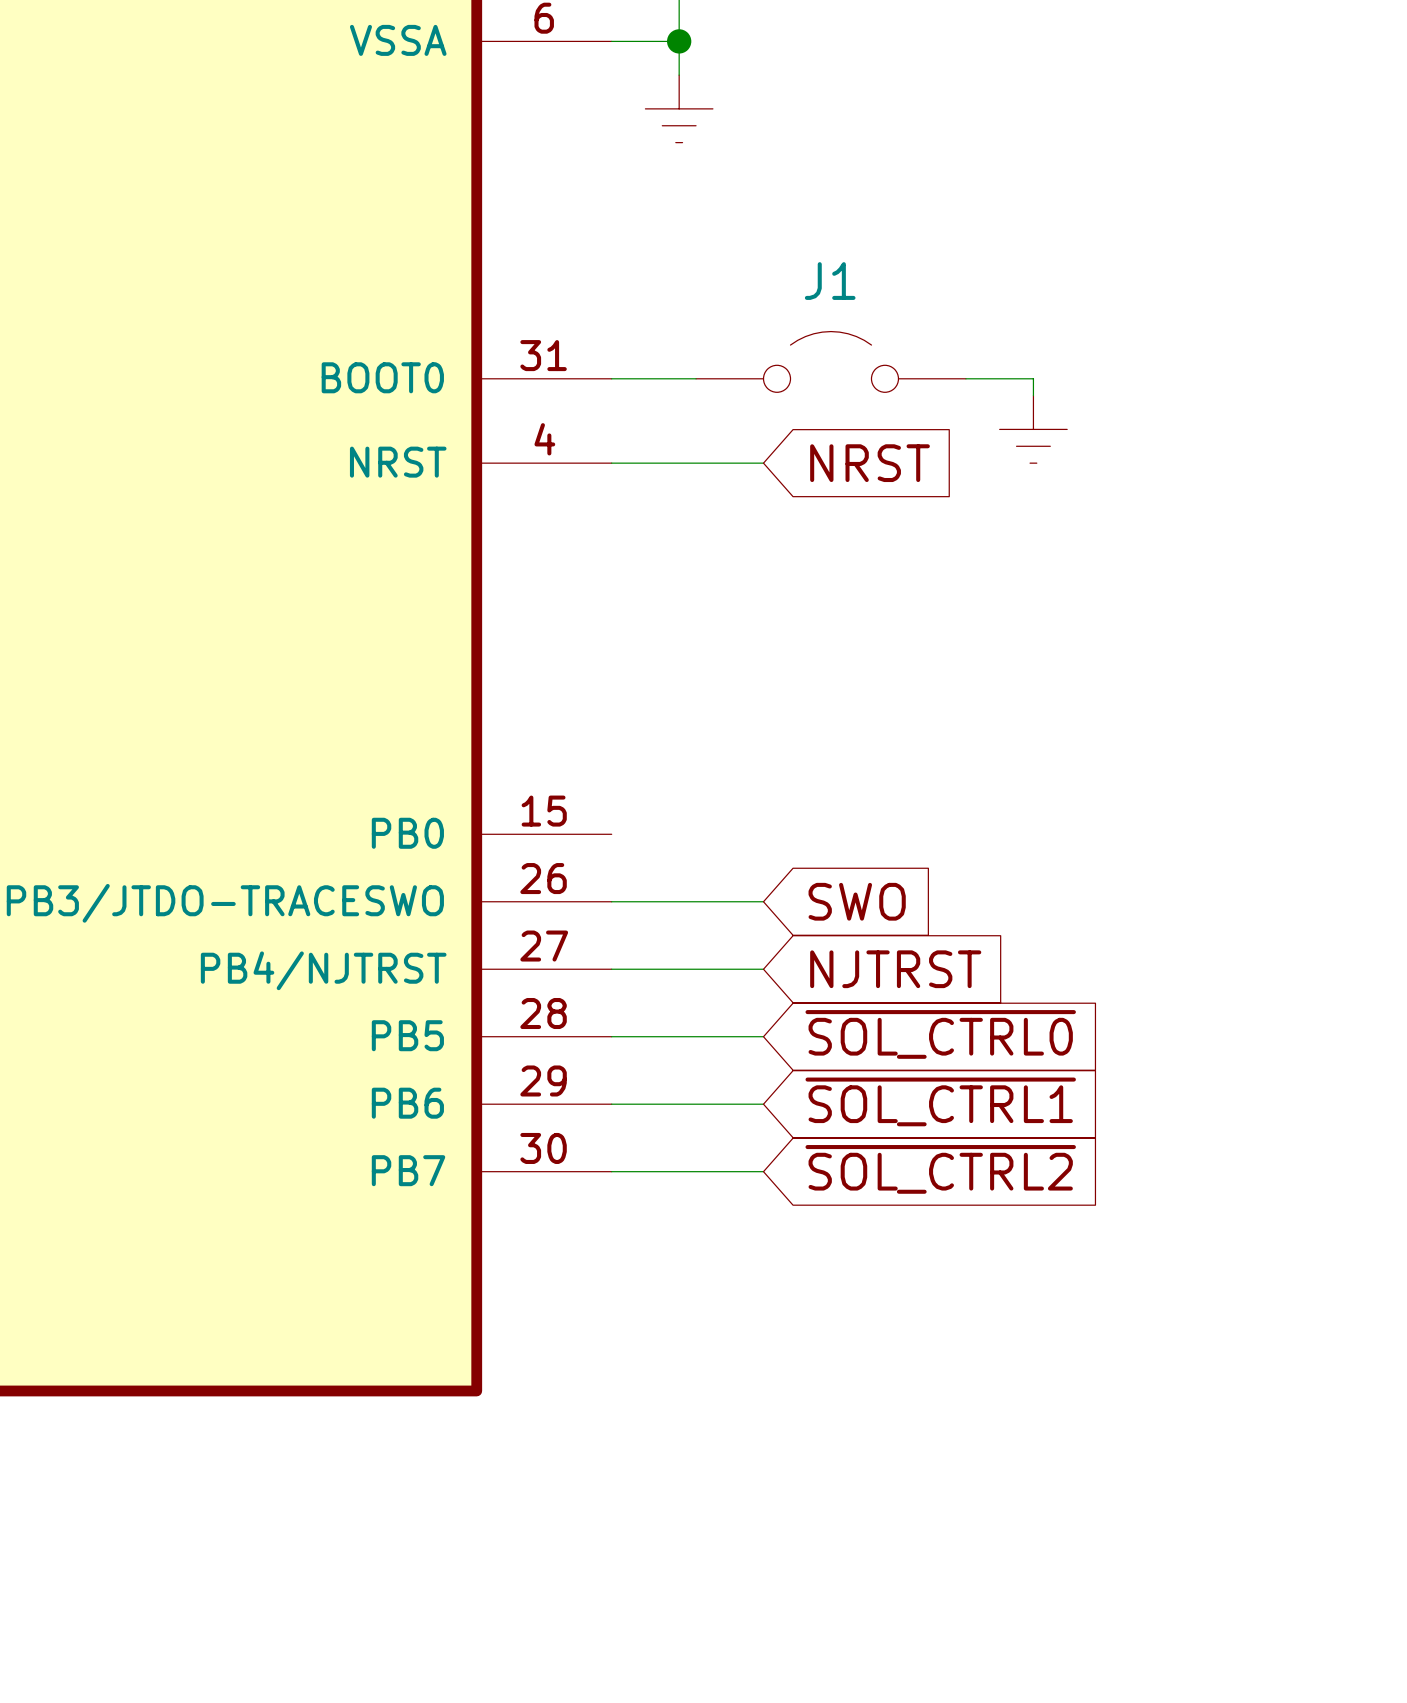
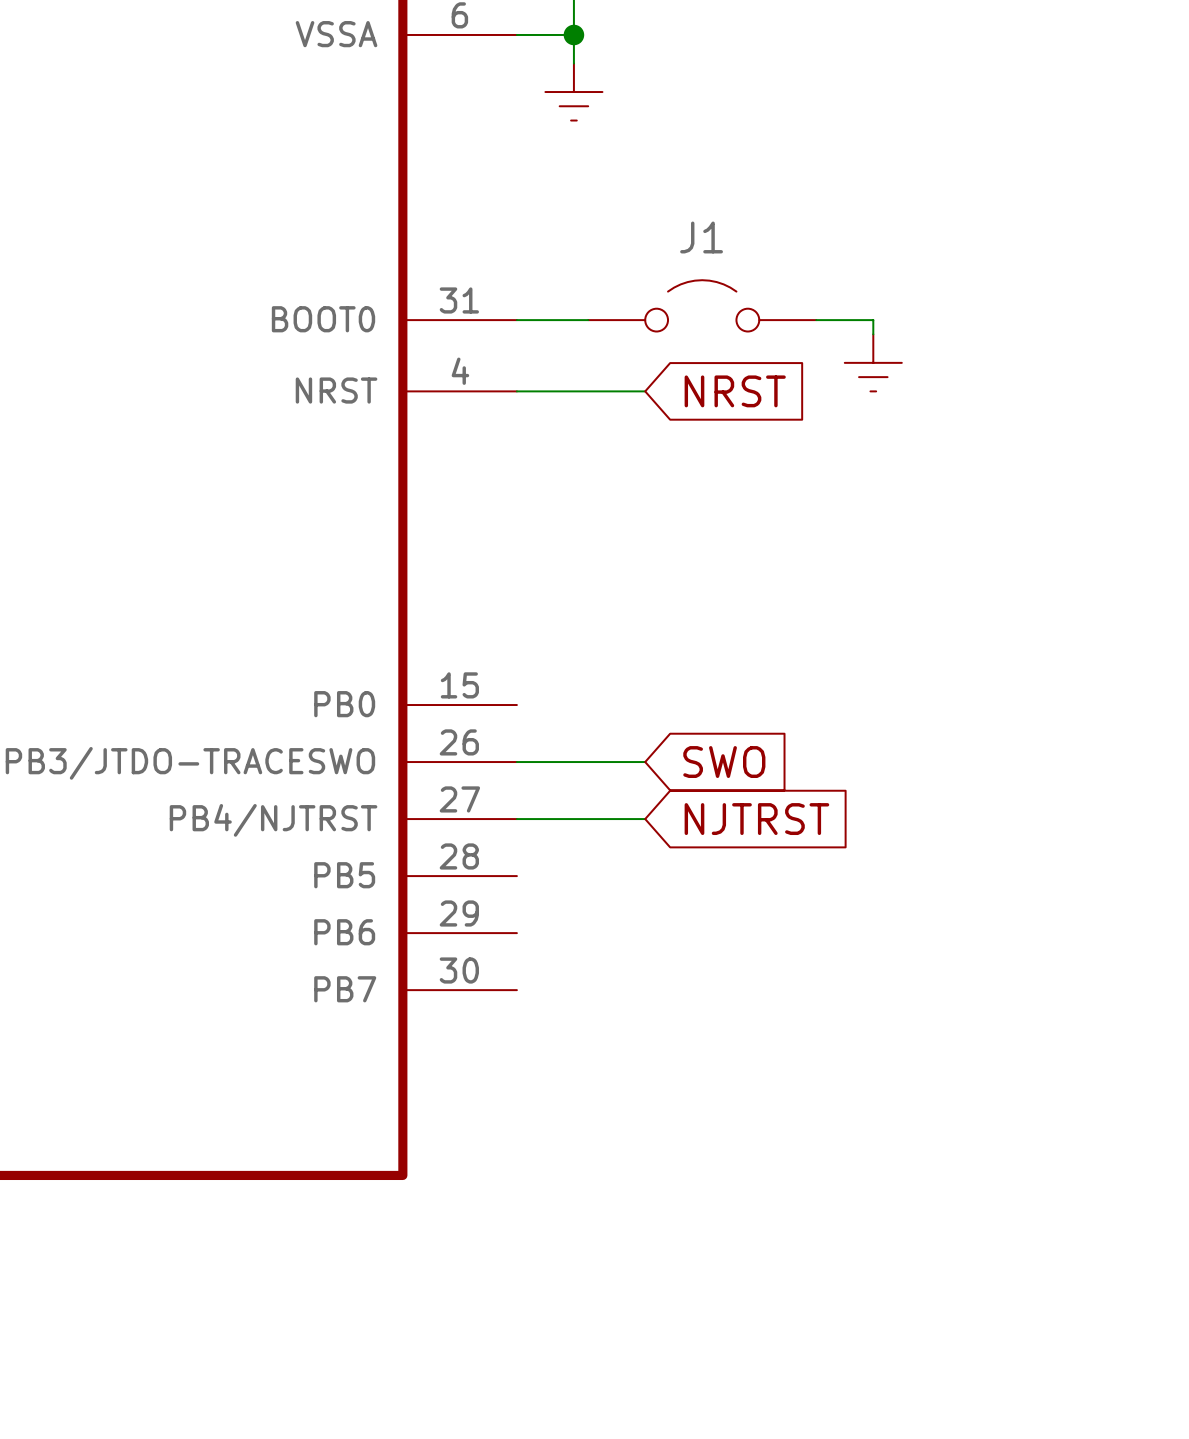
global label: ~{SOL_CTRL0} (940, 1034) -> none
wire: (611, 1036) (763, 1036) -> none
global label: ~{SOL_CTRL1} (940, 1101) -> none
wire: (611, 1104) (763, 1104) -> none
global label: ~{SOL_CTRL2} (940, 1169) -> none
wire: (611, 1171) (763, 1171) -> none

